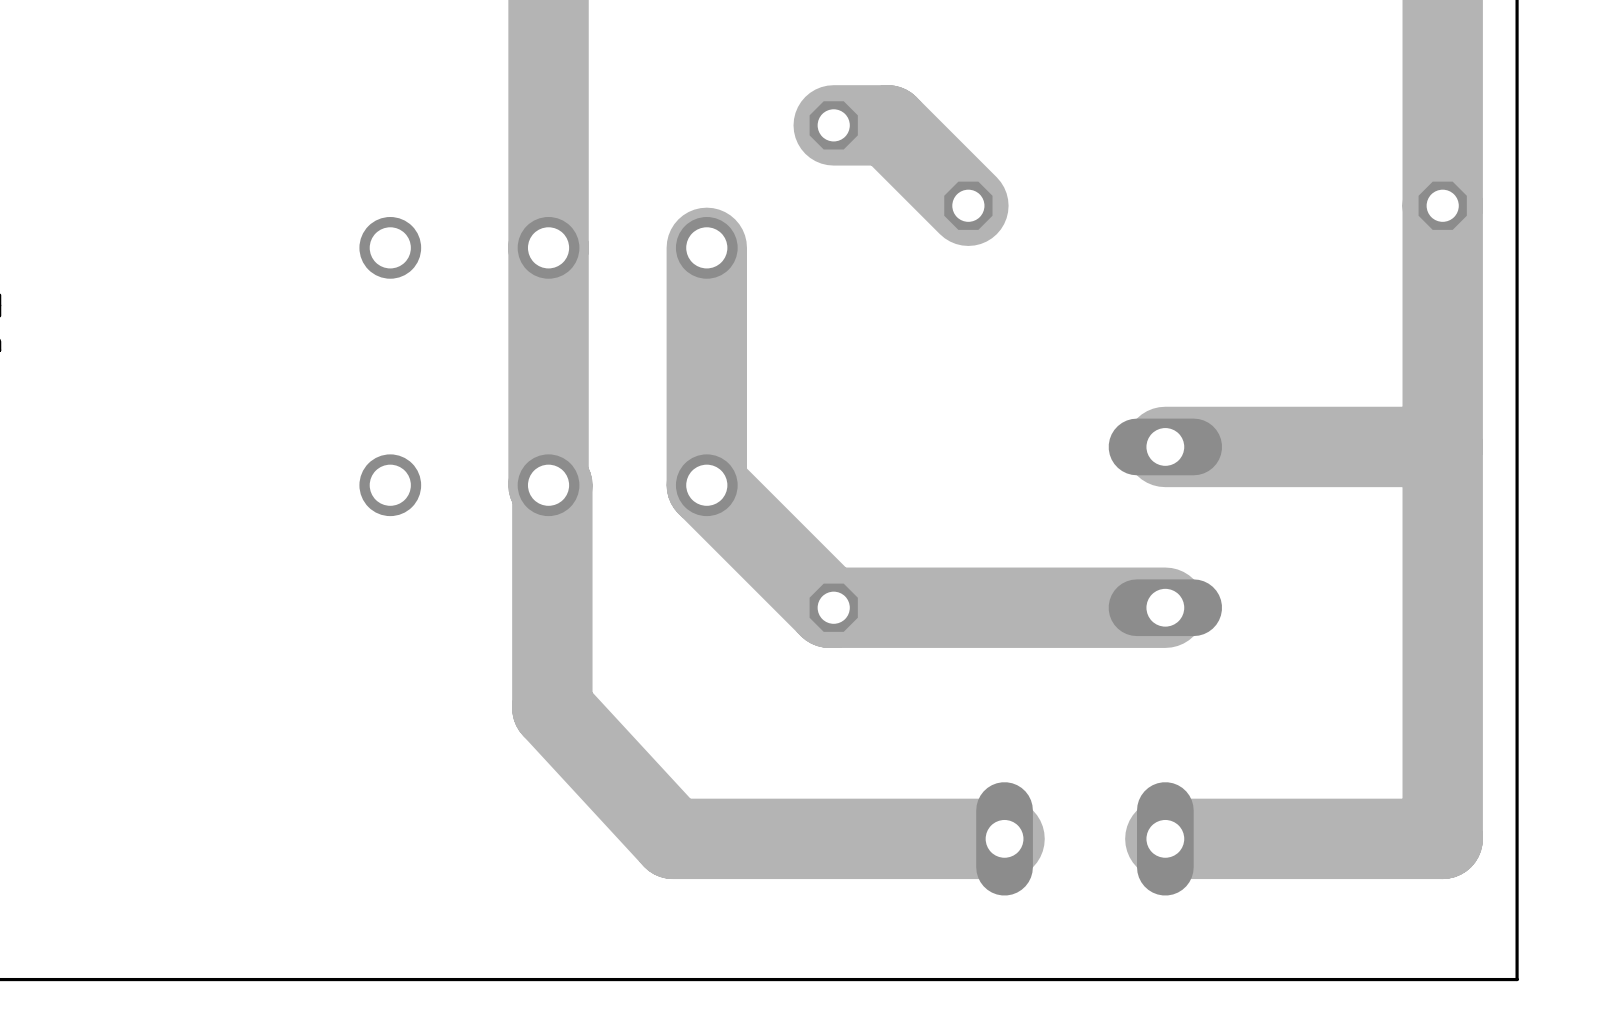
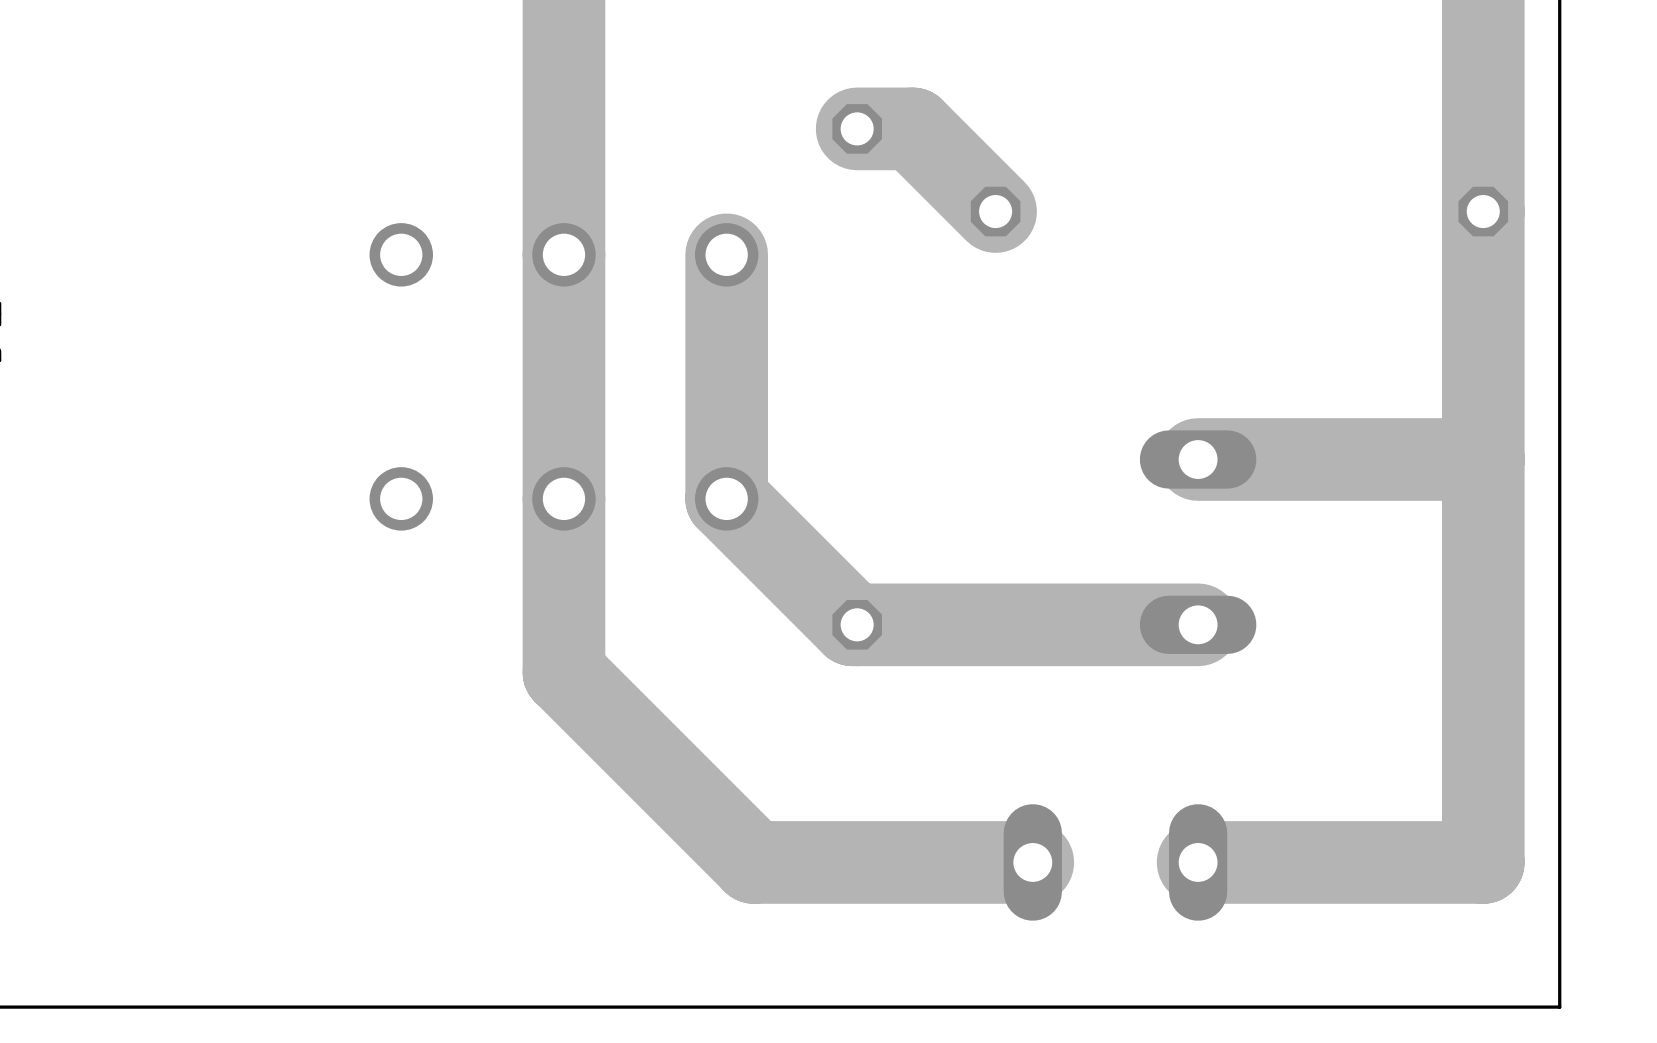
track: (548, 485) (552, 485) (552, 708) (672, 838) (733, 838) -> (563, 498) (563, 672) (753, 862)

